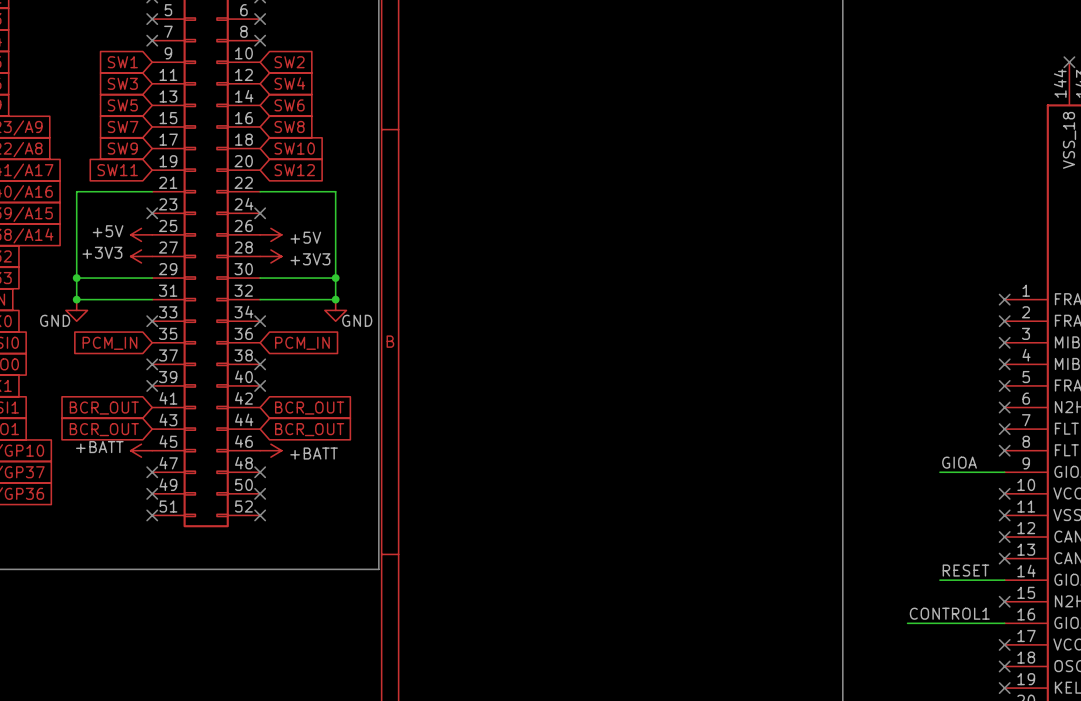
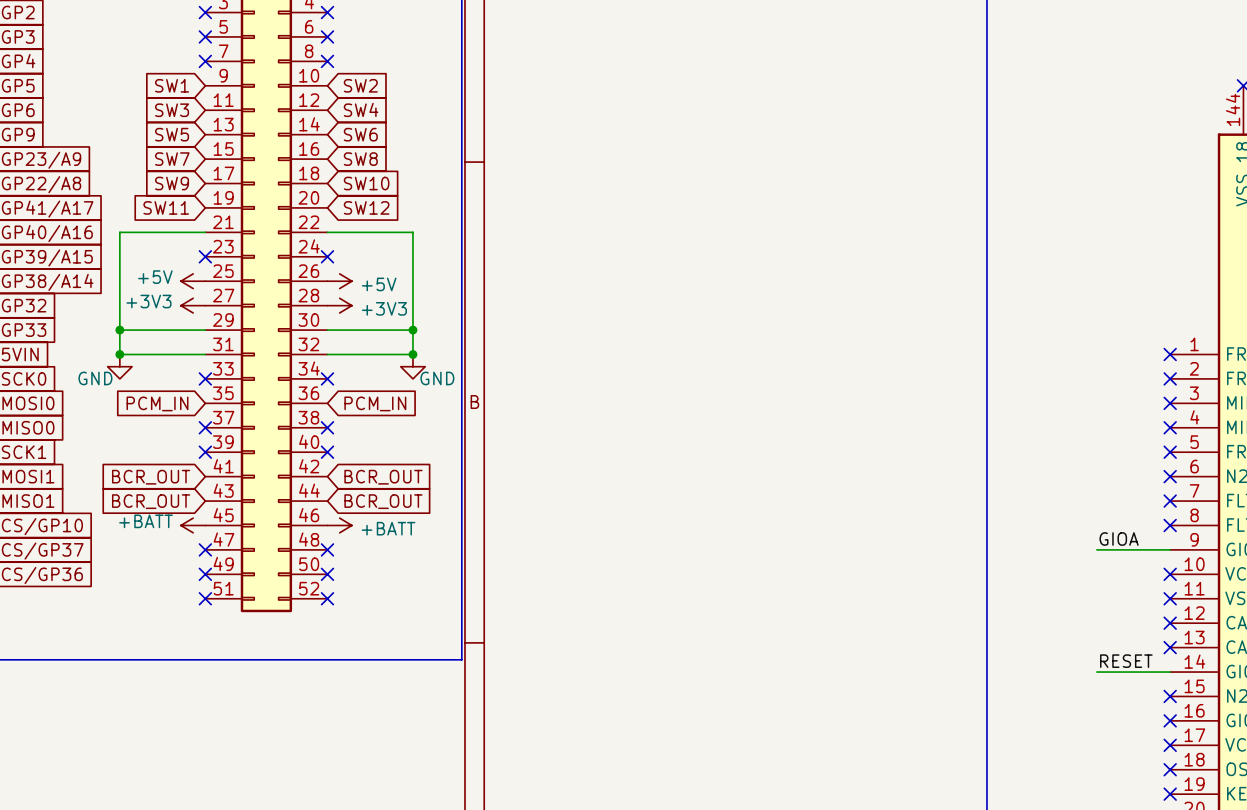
label: CONTROL1 (949, 613) -> none
wire: (907, 623) (1004, 623) -> none
no-connect mark: none -> (1170, 720)

